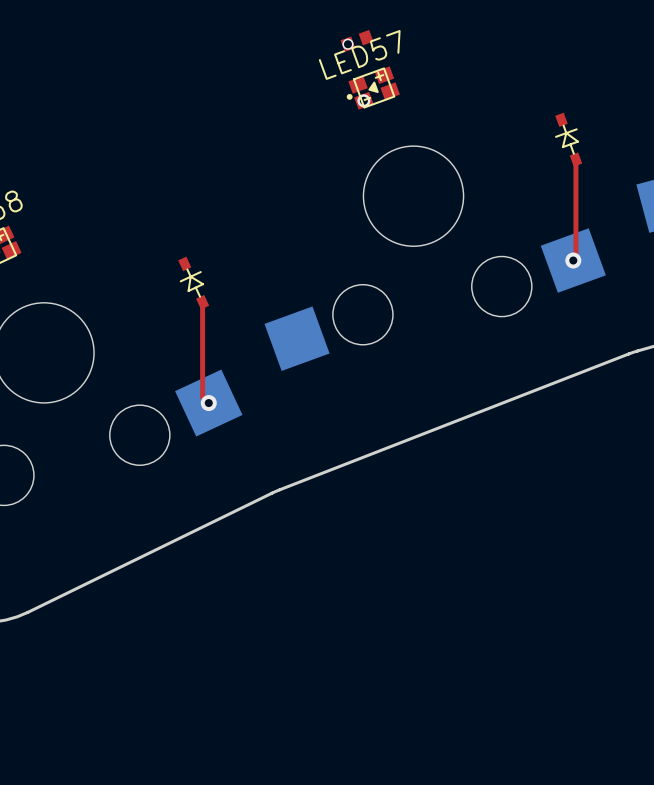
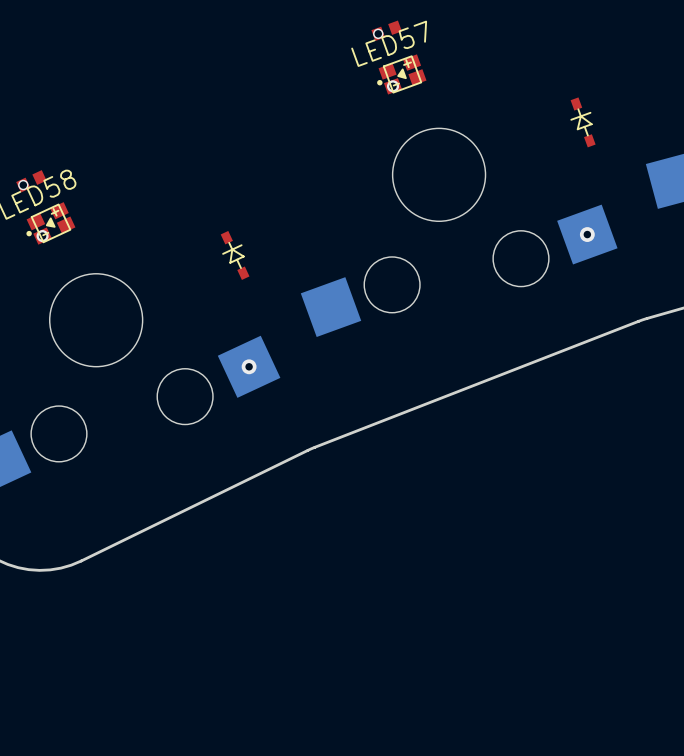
top track: (575, 159) (575, 257) (573, 260) -> none
top track: (202, 302) (202, 396) (208, 403) -> none

